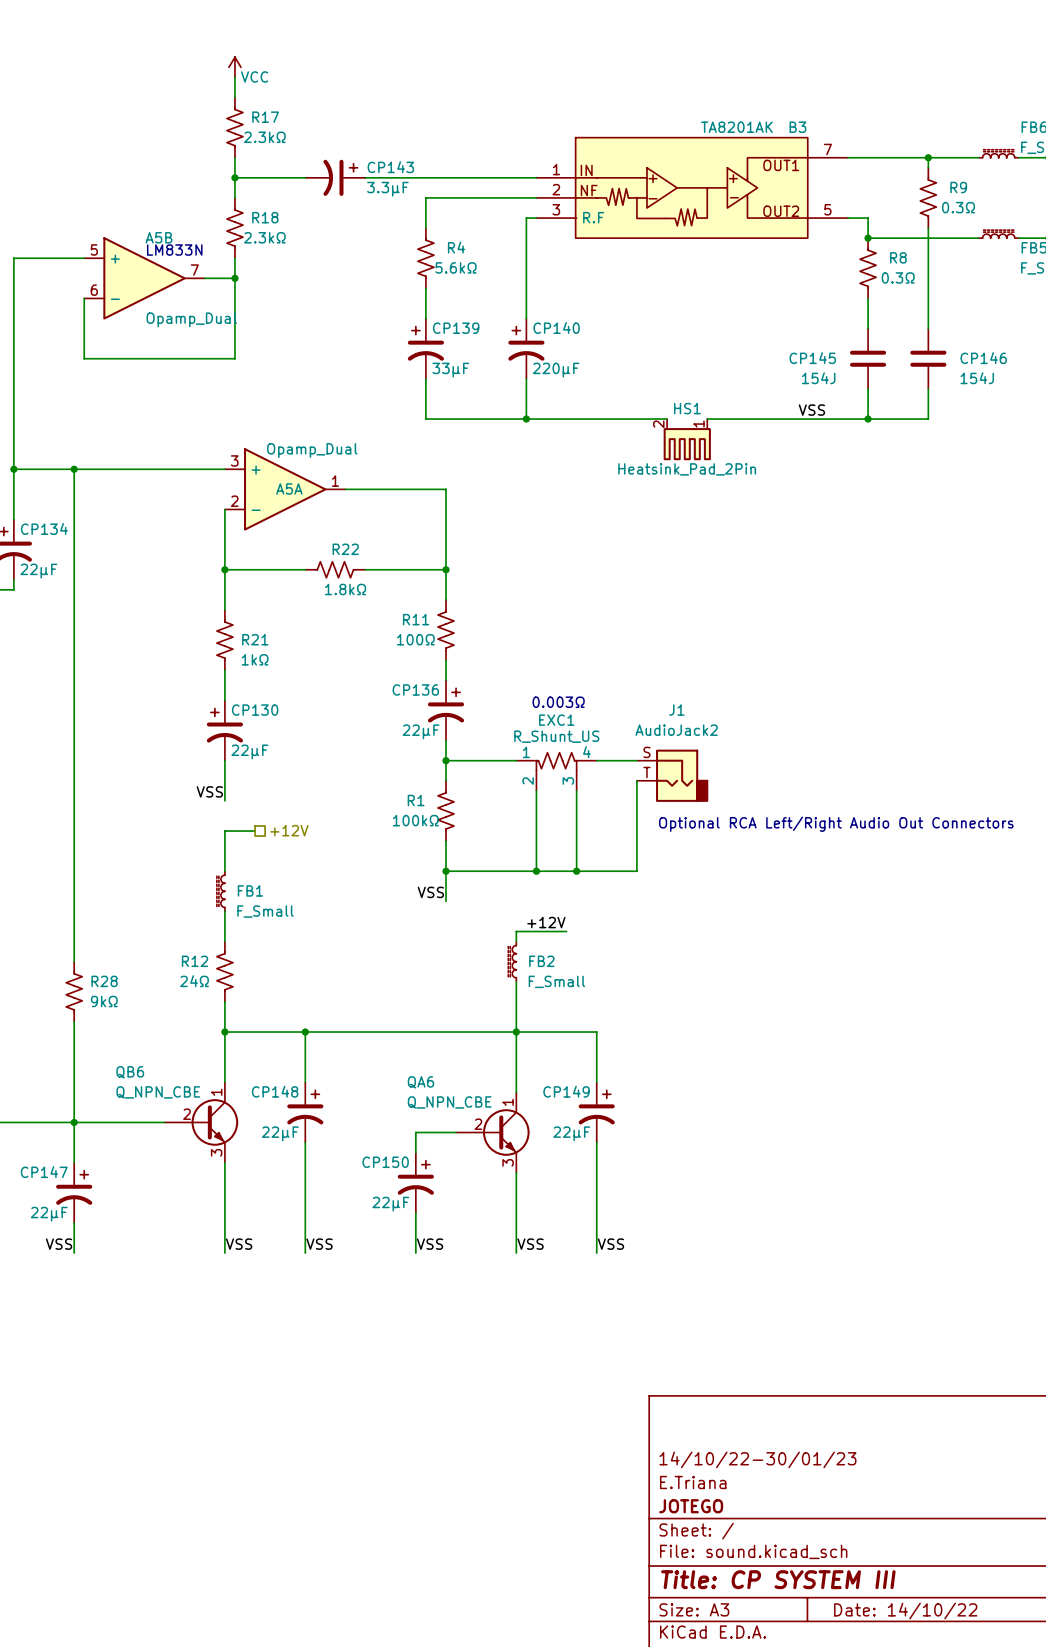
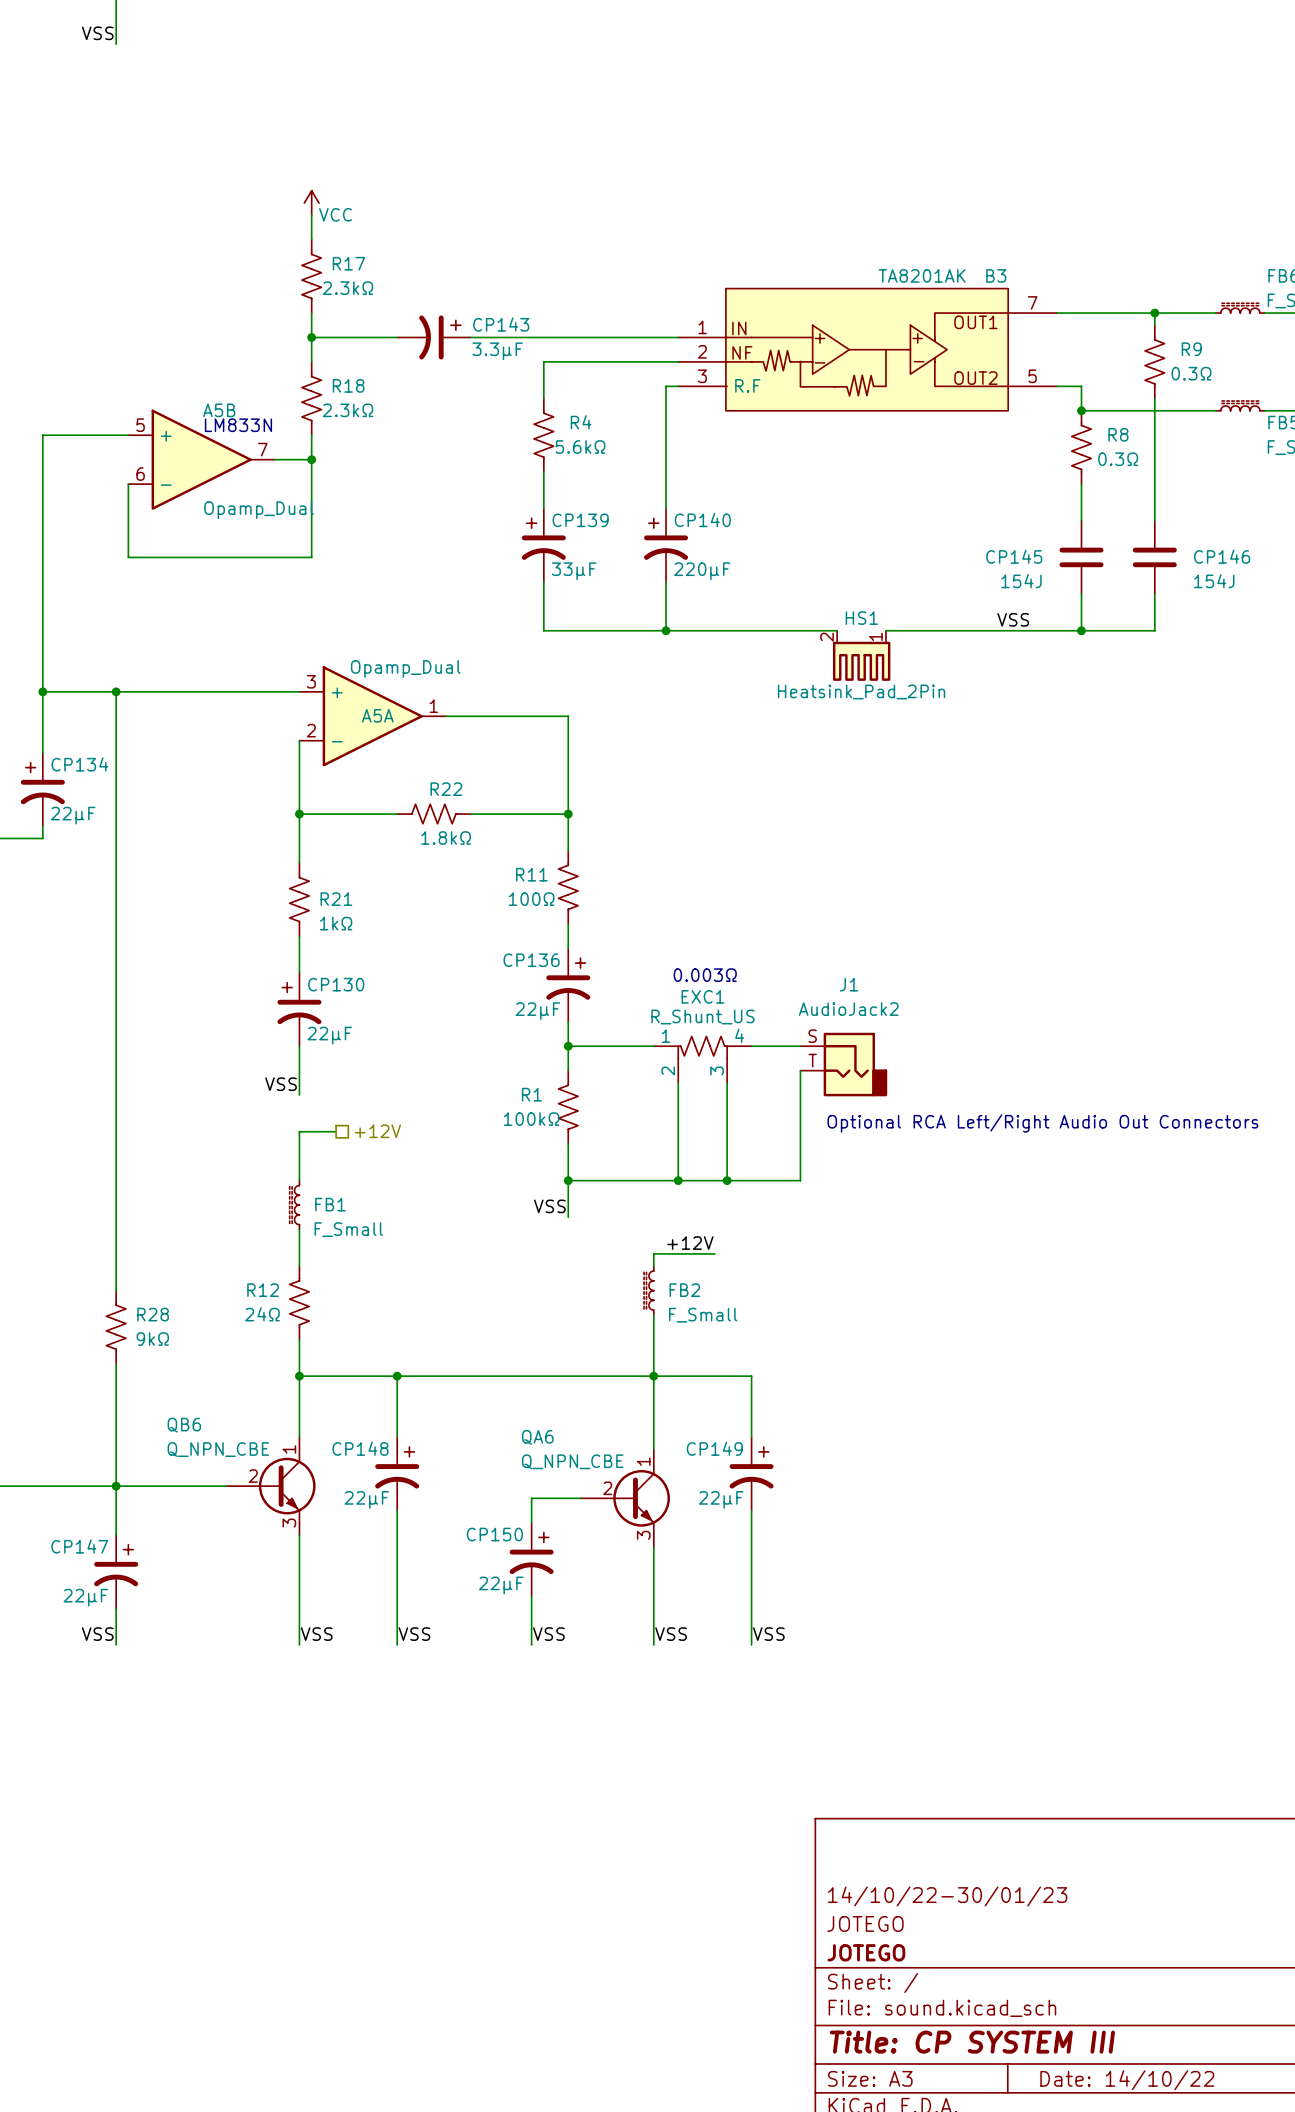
title block: E.Triana (693, 1482) -> JOTEGO (865, 1923)

